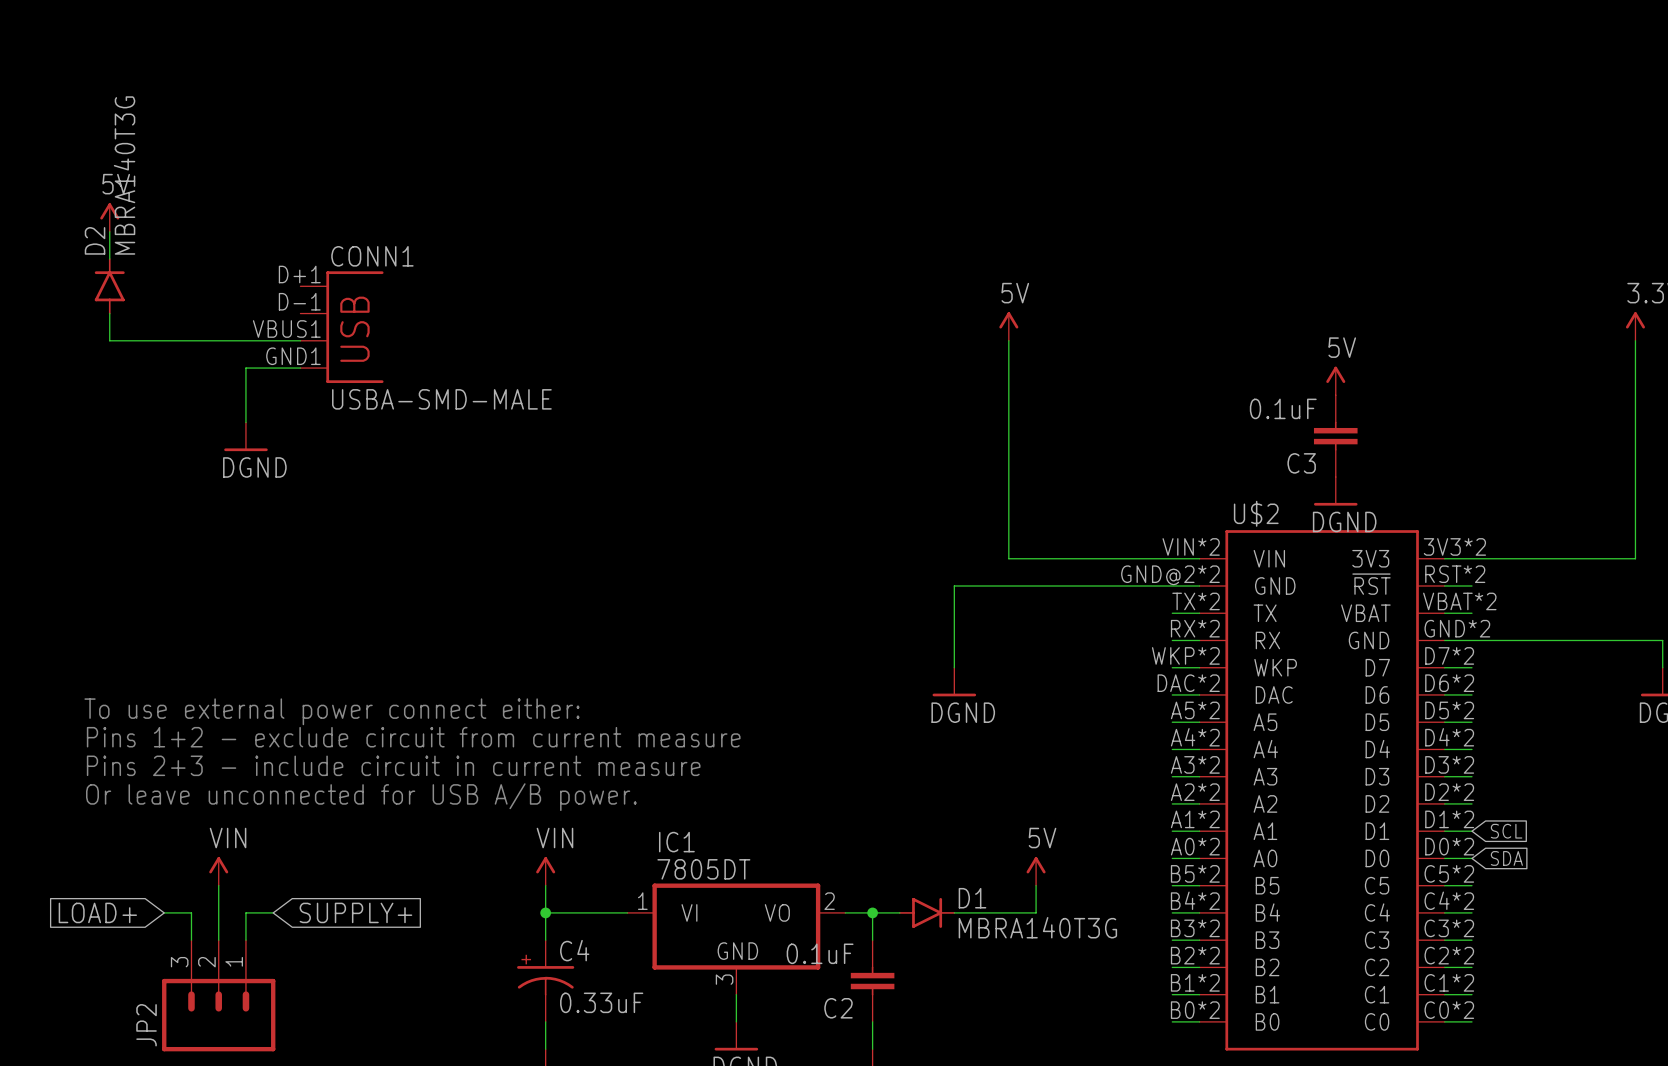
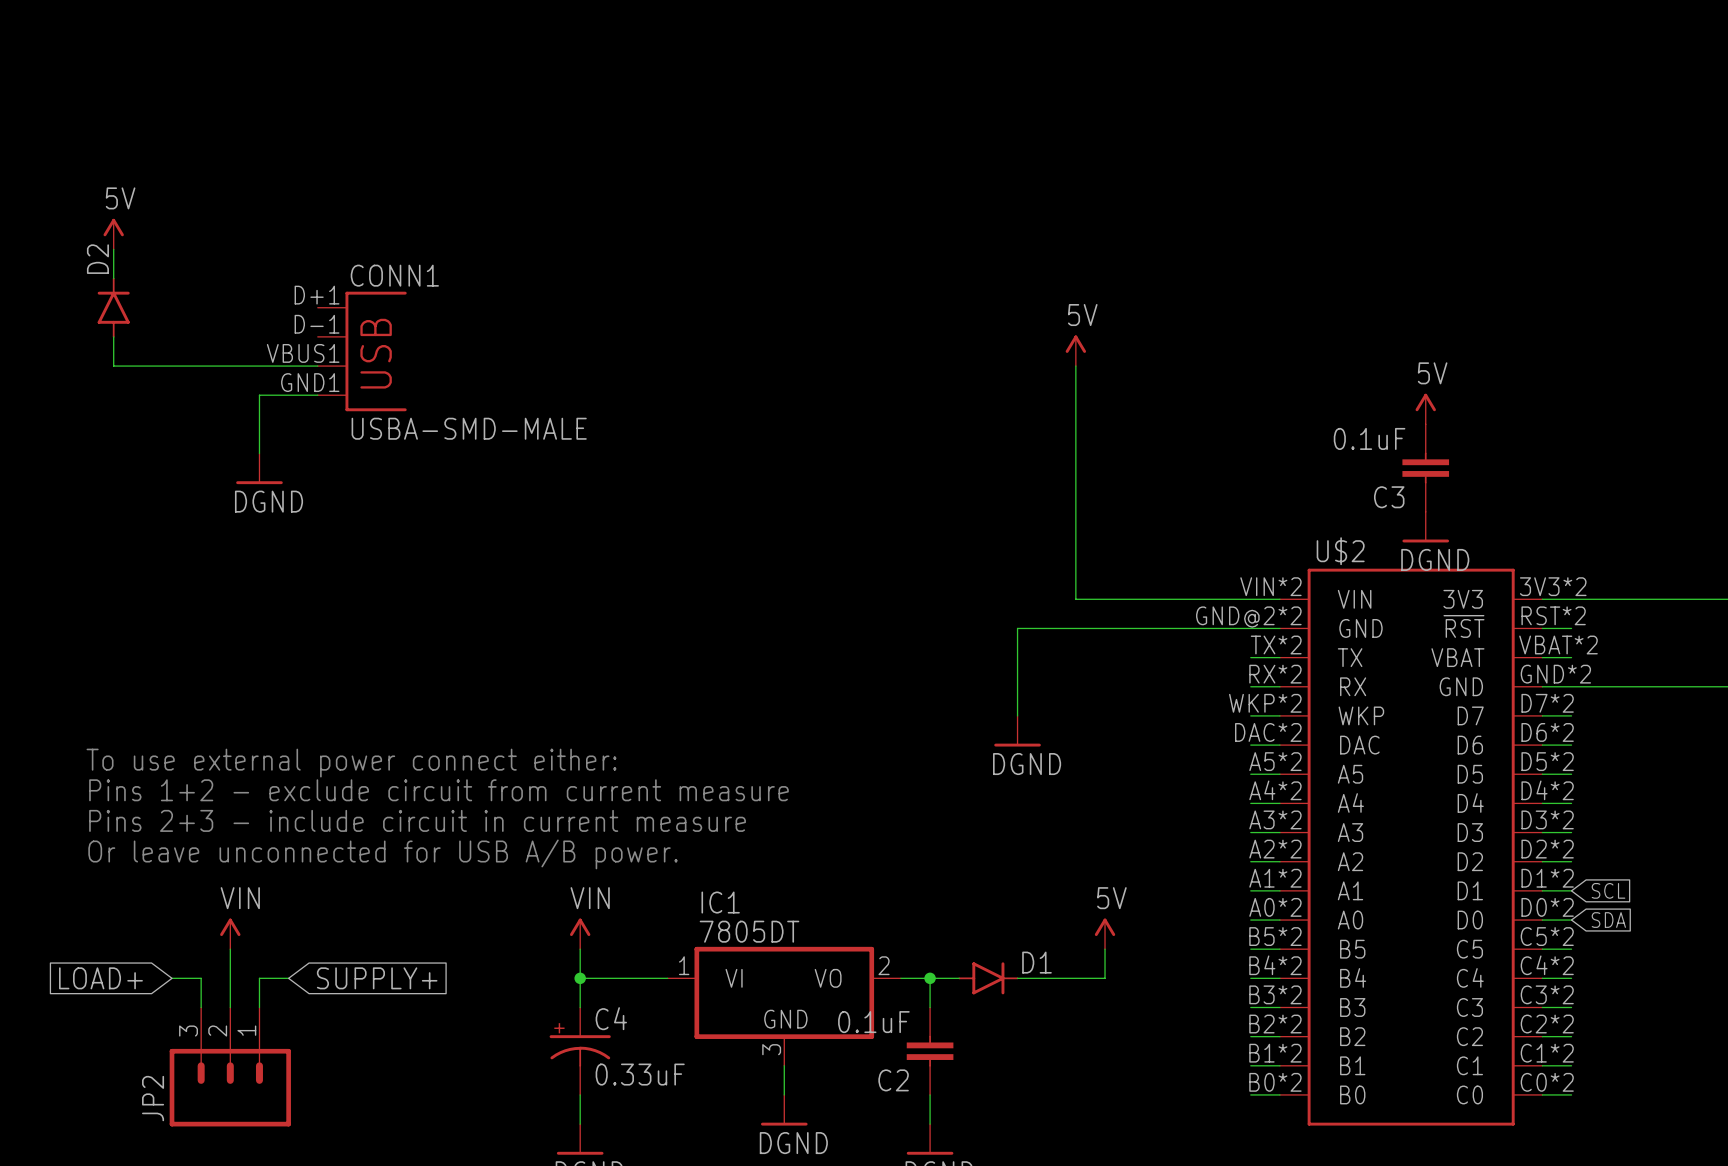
D2 value: MBRA140T3G (124, 175) -> none
D1 value: MBRA140T3G (1037, 927) -> none

